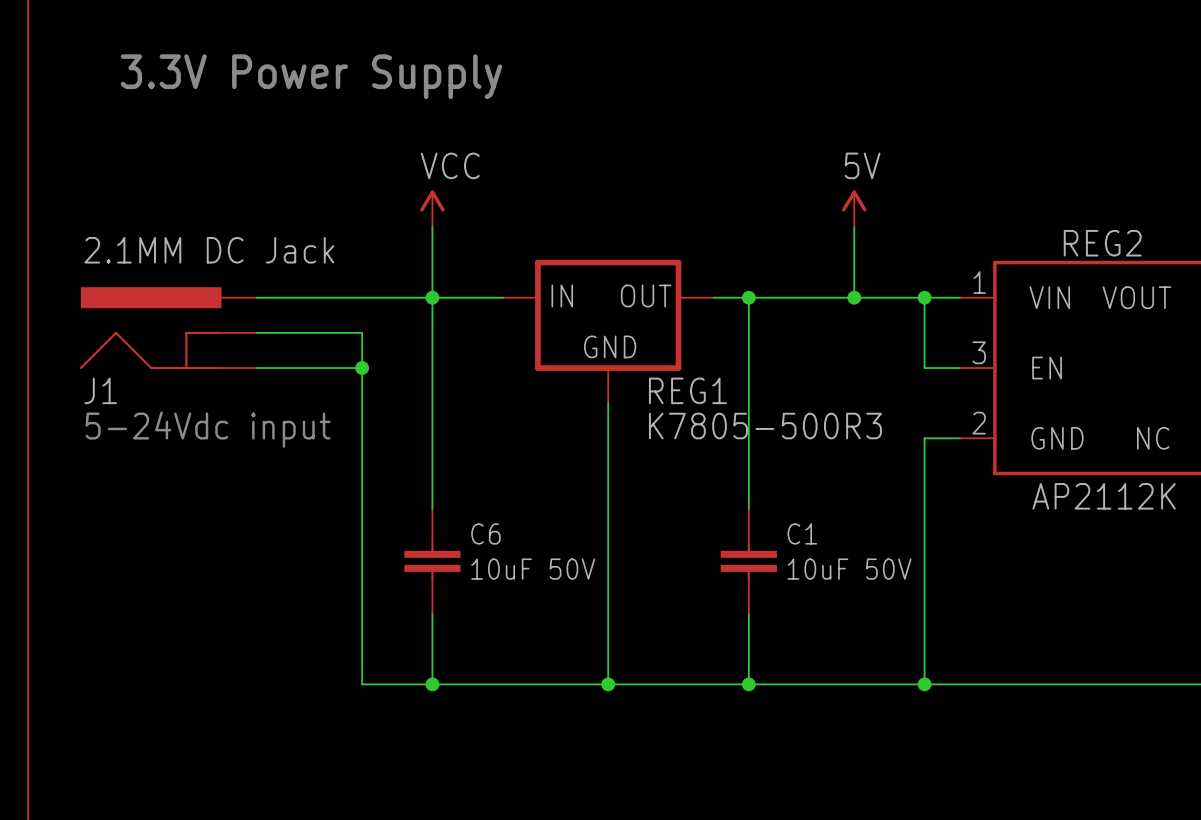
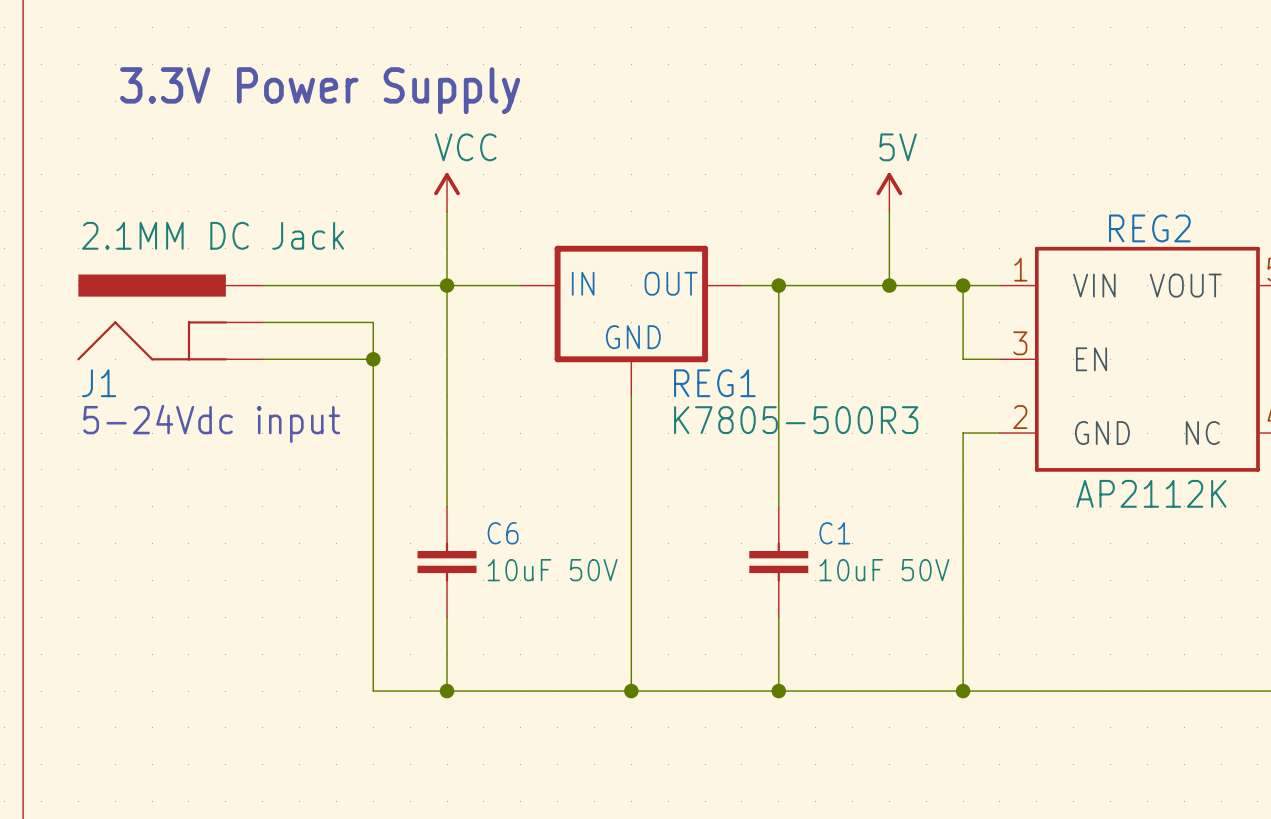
text position: 3.3V Power Supply (311, 76) -> 3.3V Power Supply (320, 90)

